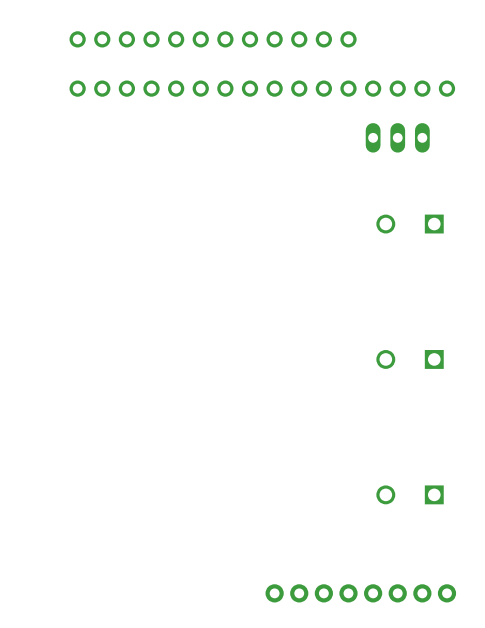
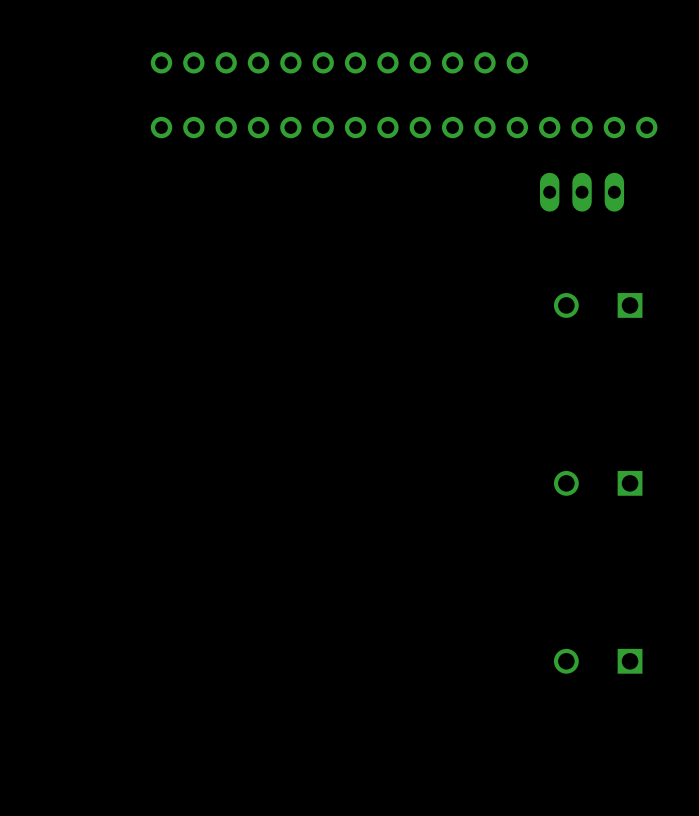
part: (360, 593) -> none

